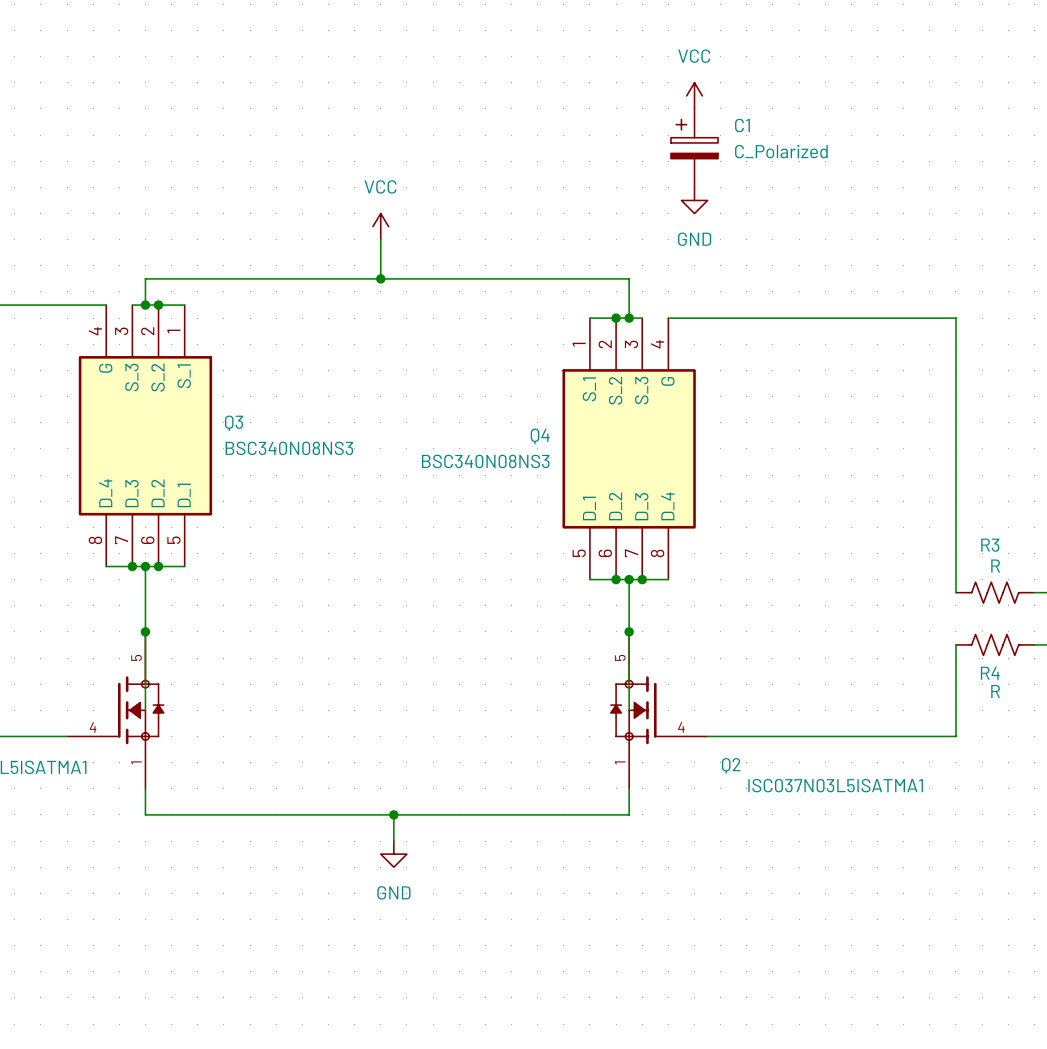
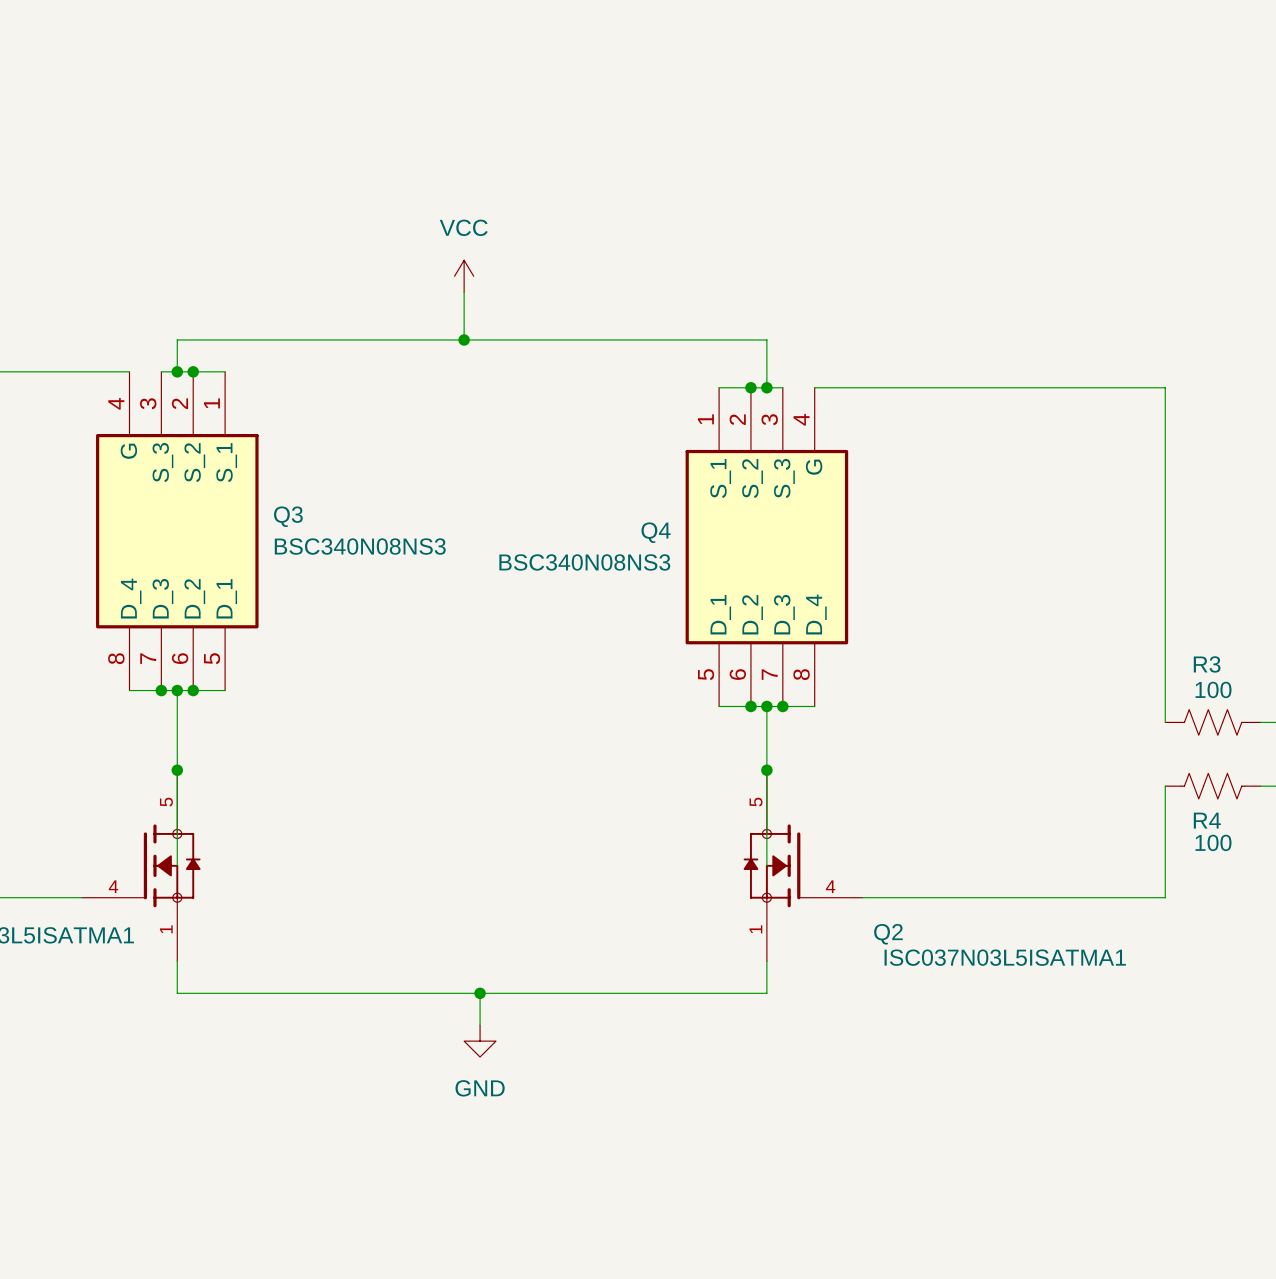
power symbol: VCC (694, 95) -> none
C1: C_Polarized (694, 148) -> none
power symbol: GND (694, 200) -> none
R3 value: R (995, 566) -> 100 (1213, 689)
R4 value: R (995, 691) -> 100 (1213, 842)

